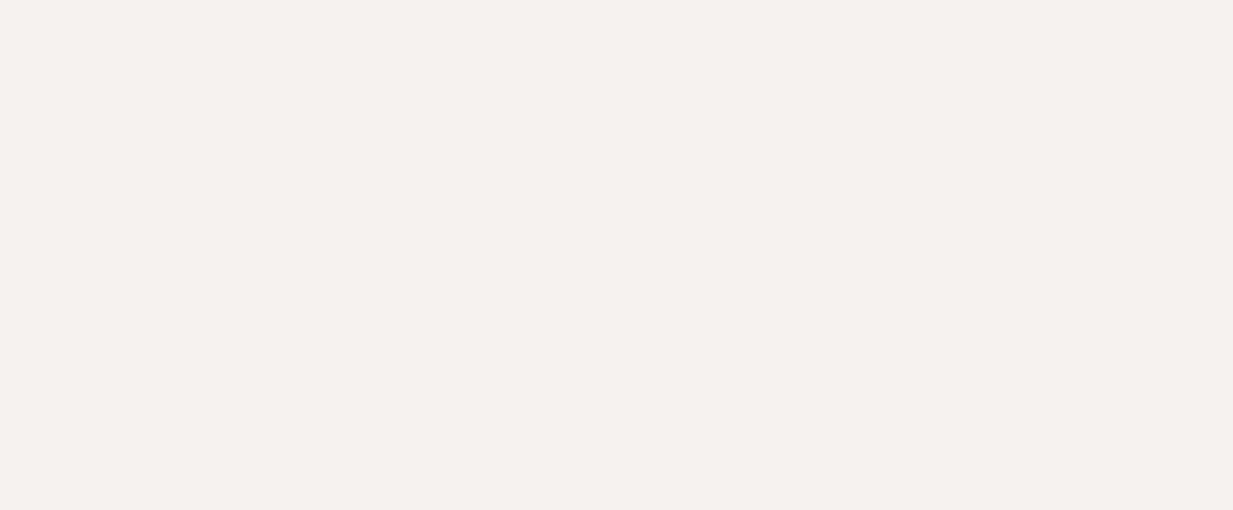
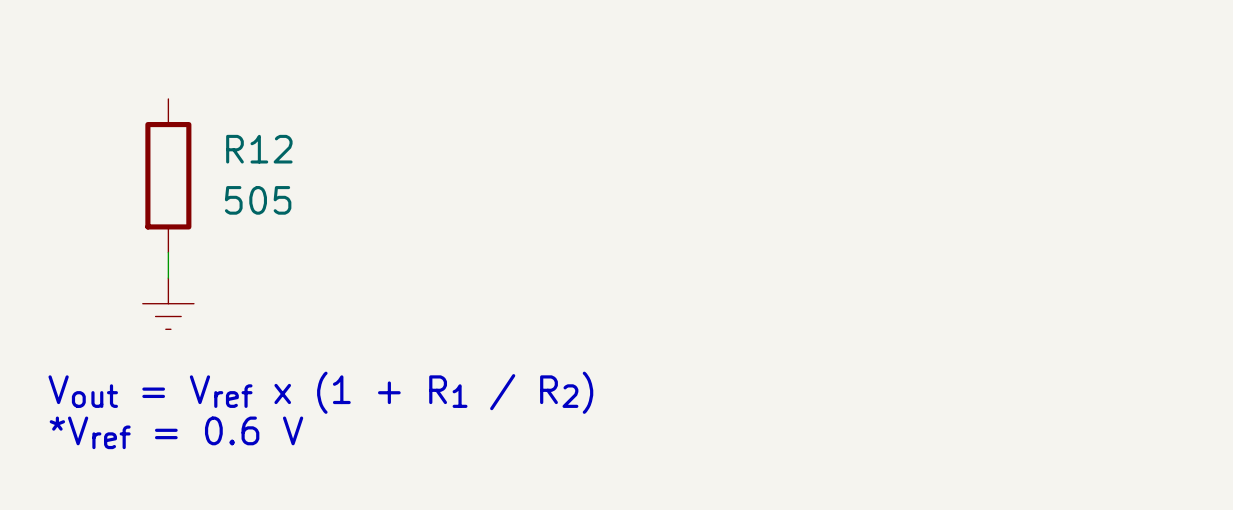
R12: none -> 505 (168, 175)
wire: none -> (168, 252) (168, 278)
power symbol: none -> (168, 303)
text: none -> Vout = Vref x (1 + R1 / R2) (320, 392)
text: none -> *Vref = 0.6 V (176, 432)

